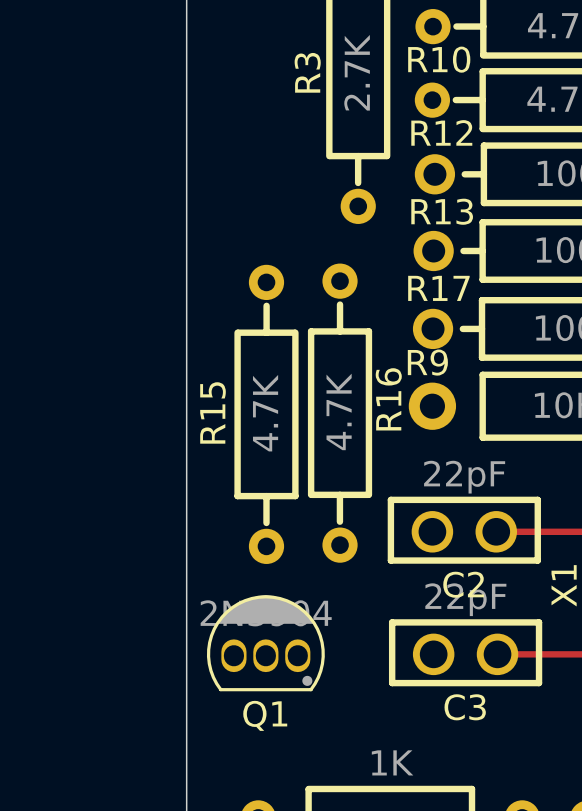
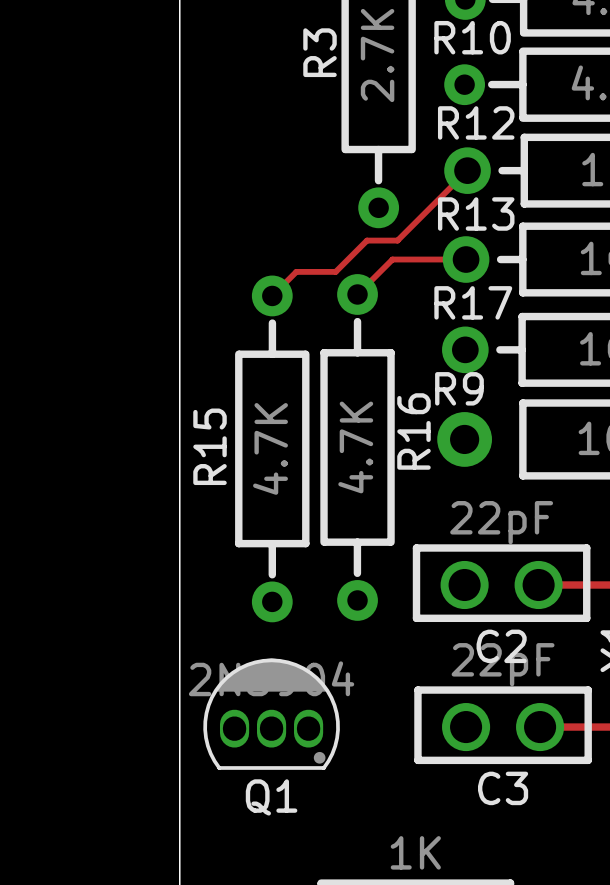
track: none -> (467, 170) (397, 240) (366, 240) (335, 271) (296, 271) (272, 295)
track: none -> (466, 259) (392, 259) (357, 294)

